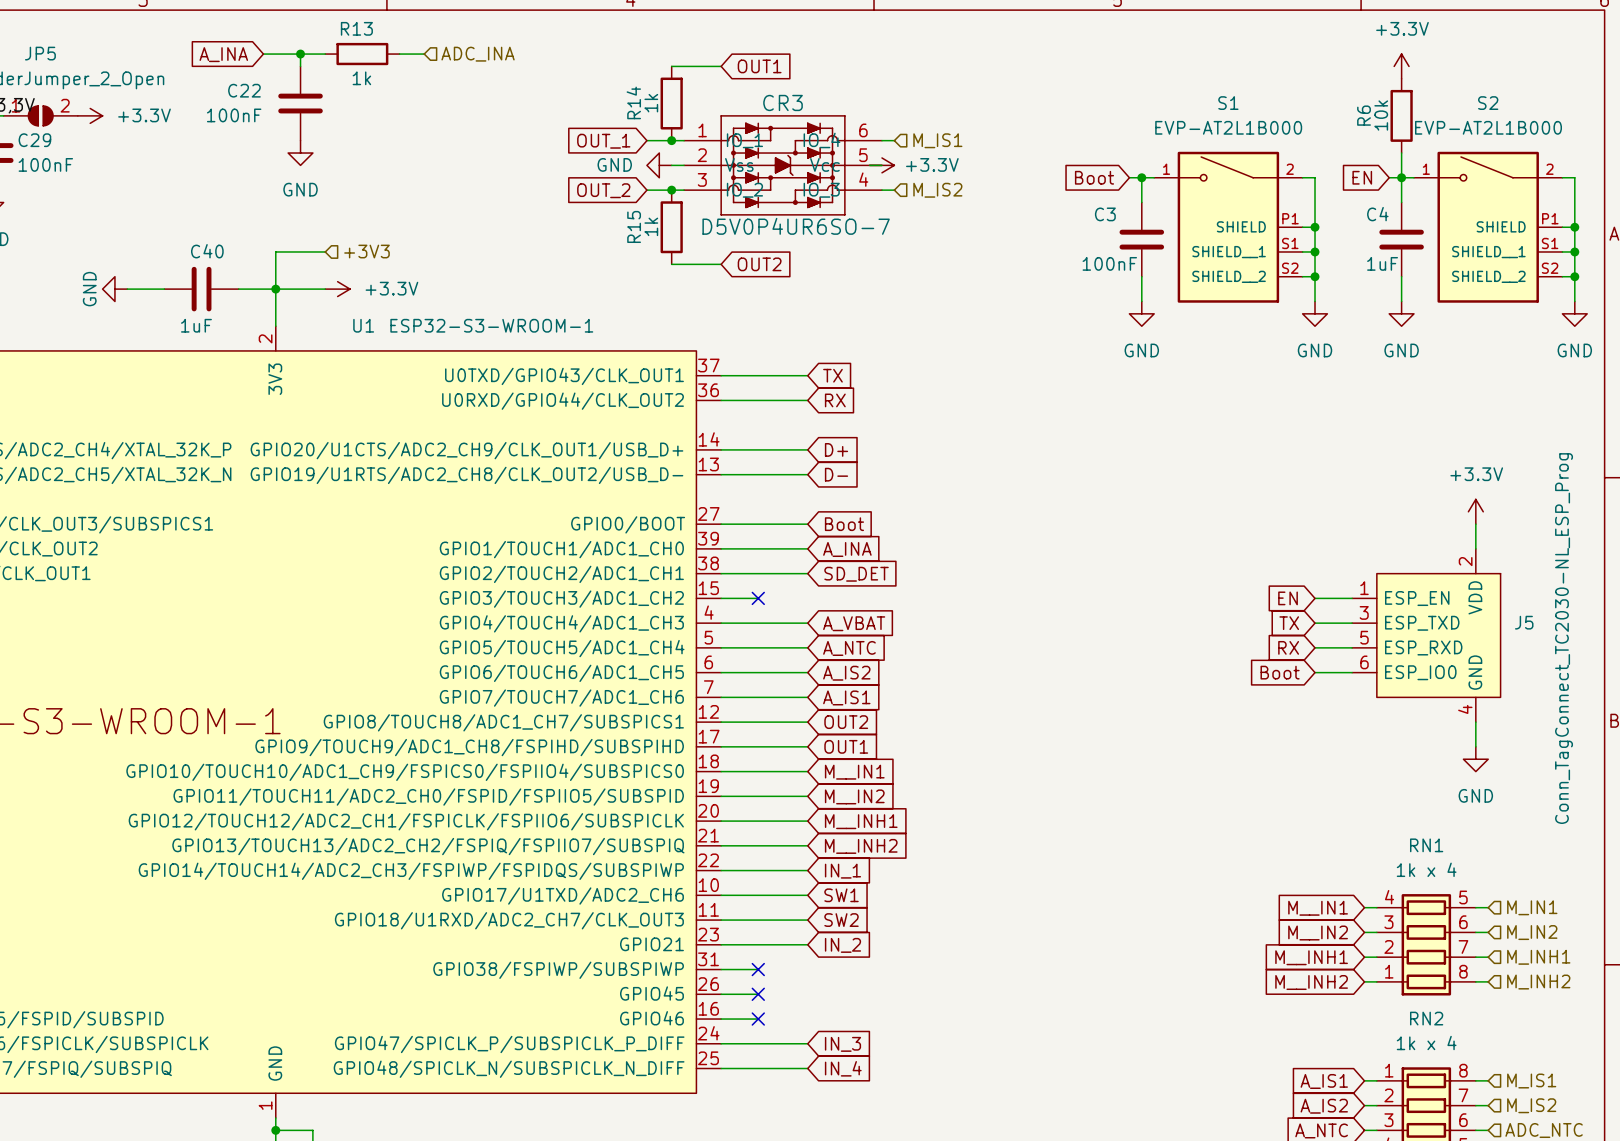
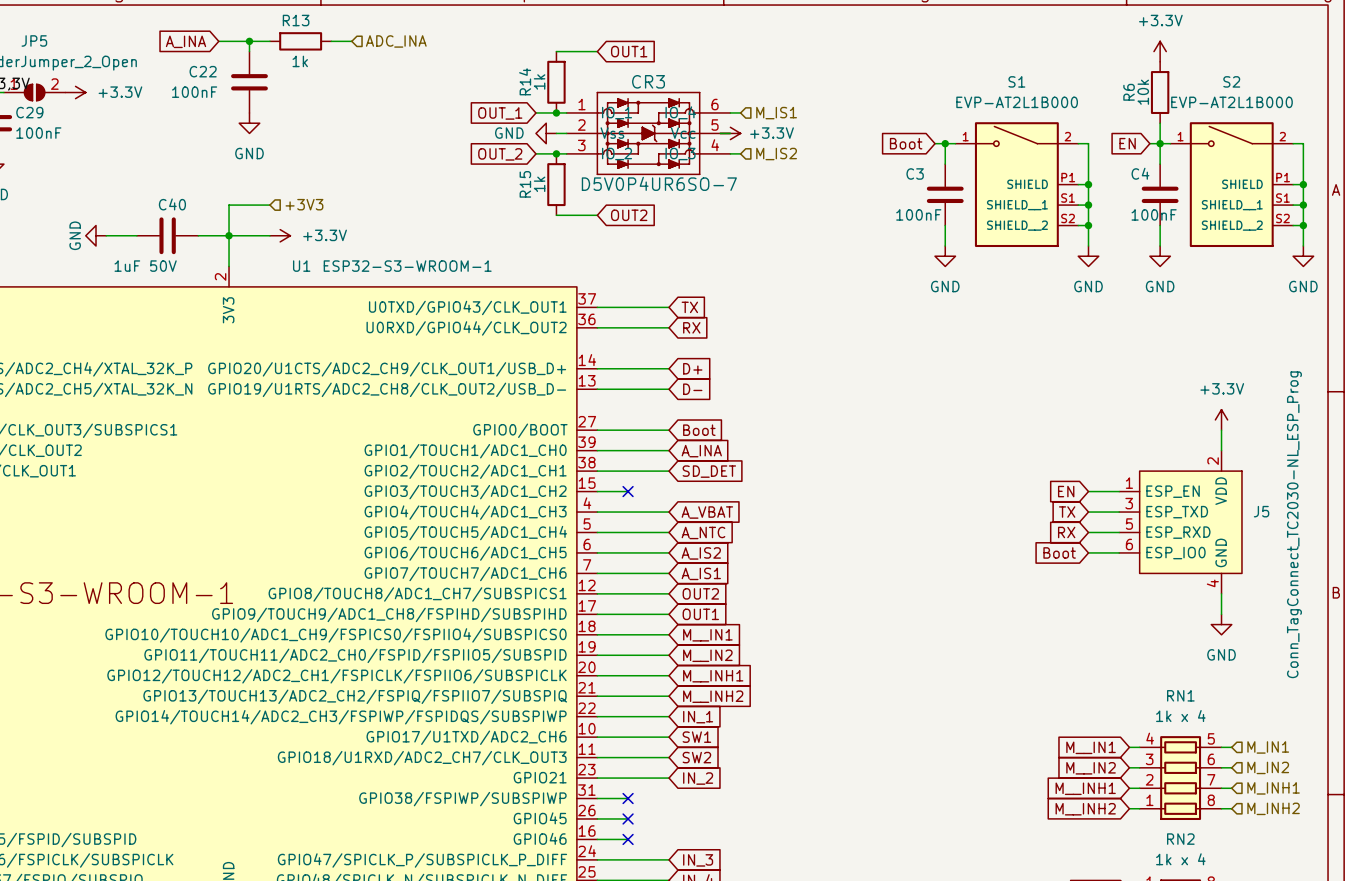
C4 value: 1uF (1382, 263) -> 100nF (1154, 214)
C40 value: 1uF (196, 325) -> 1uF 50V (145, 266)

